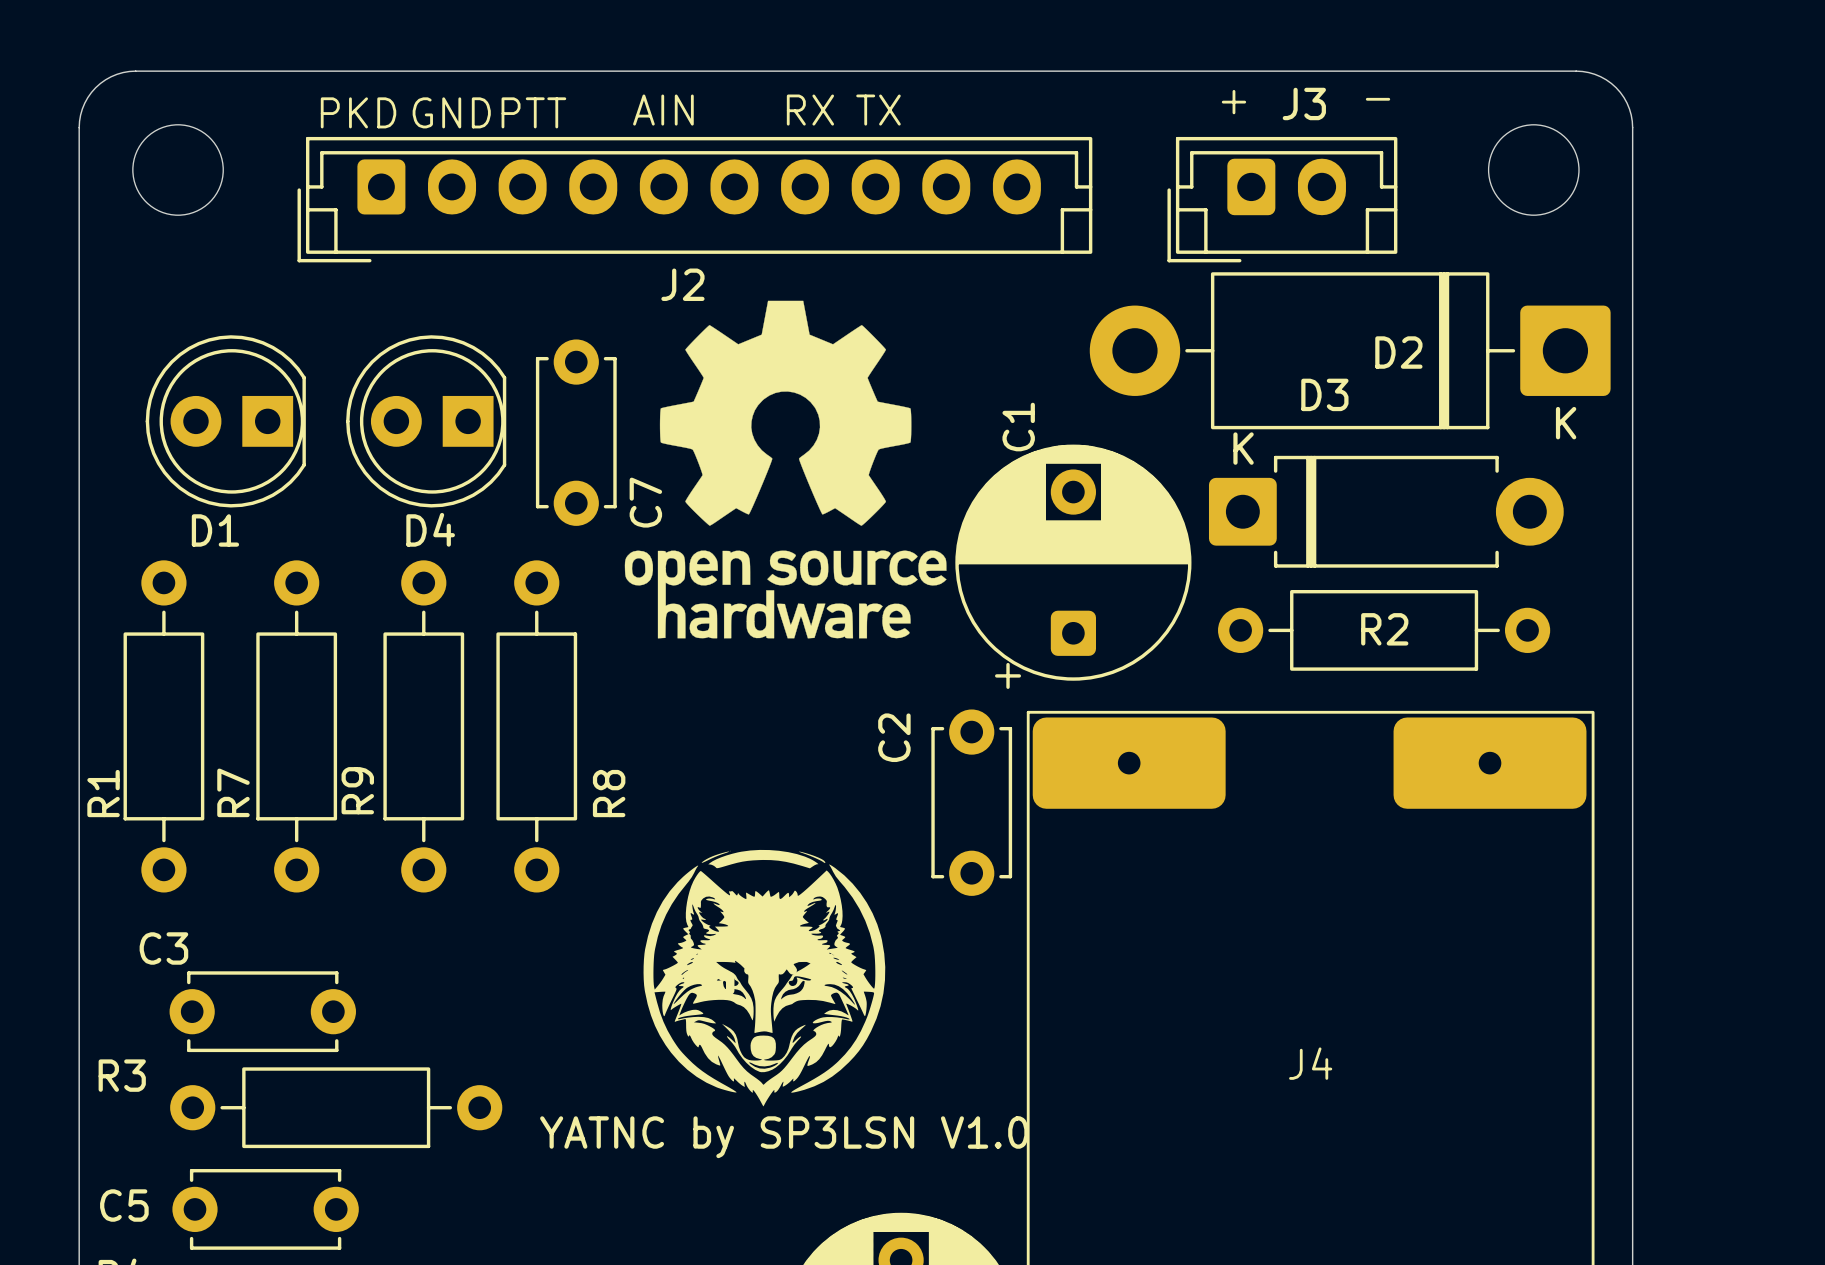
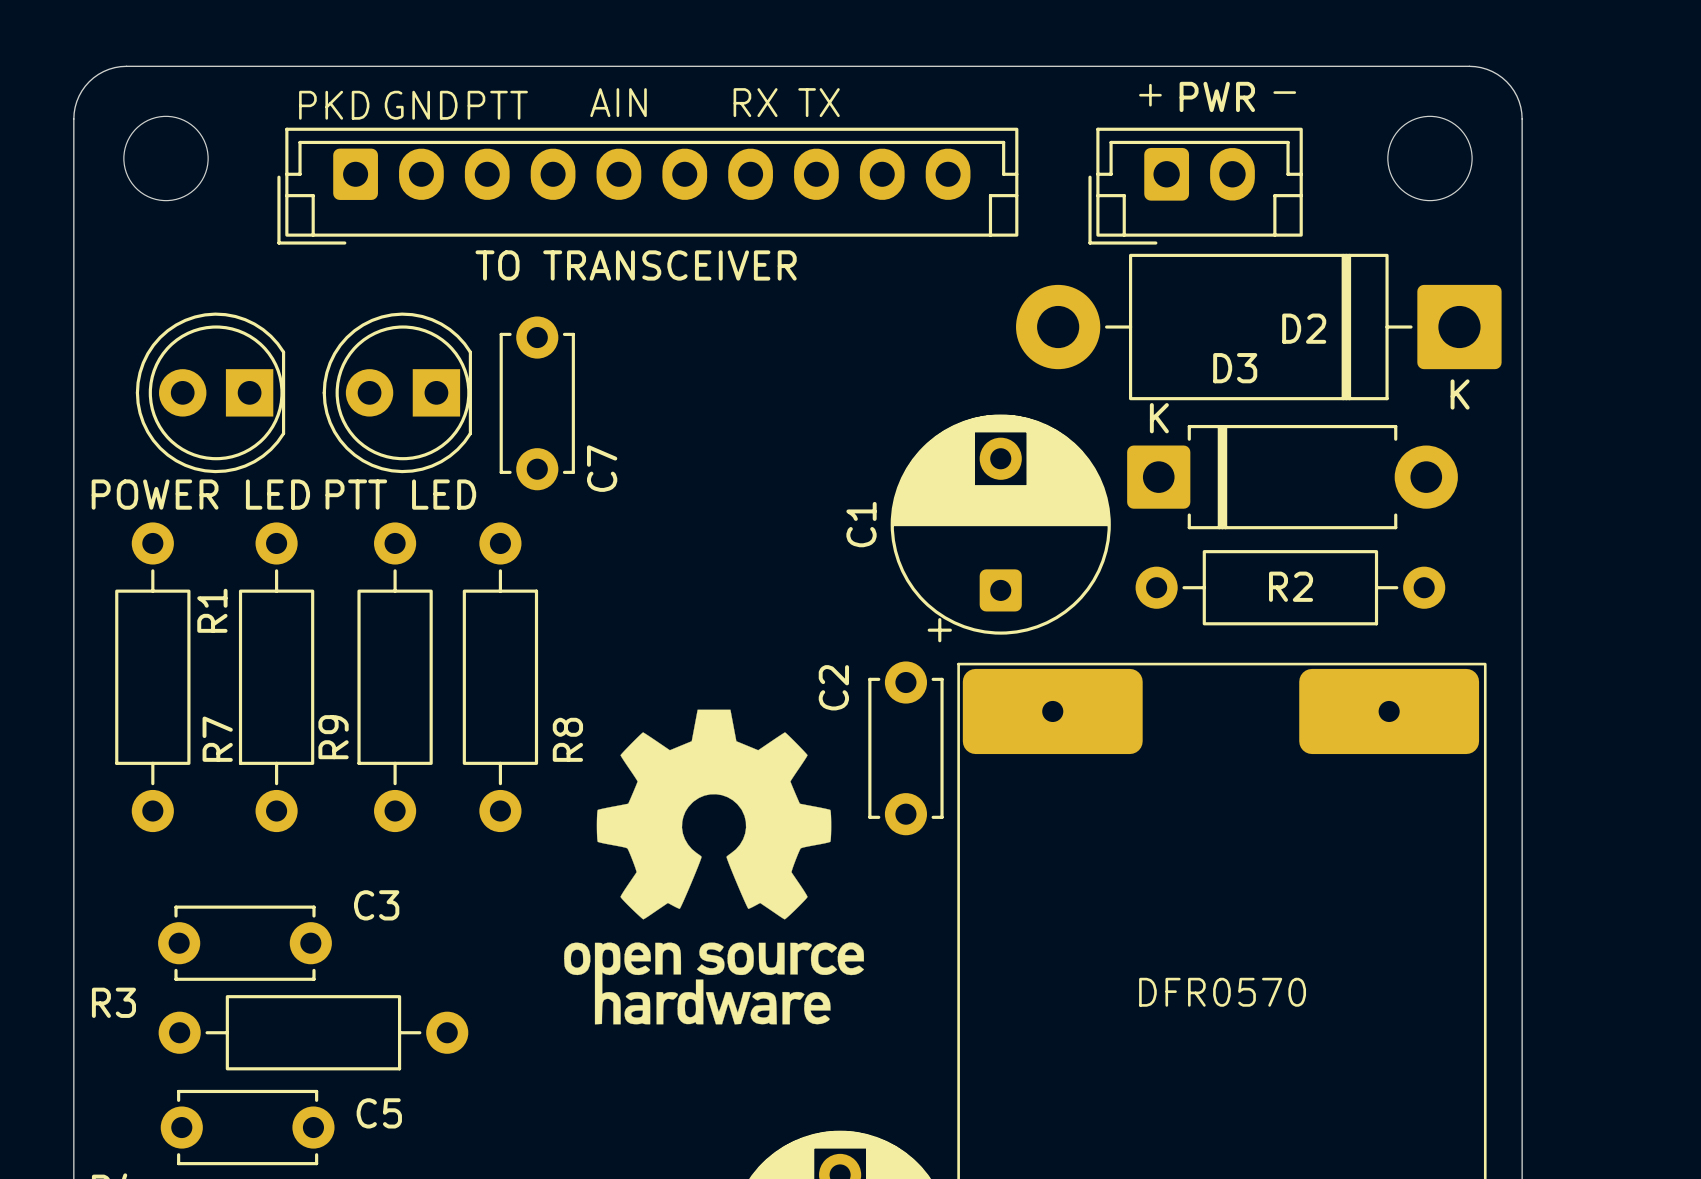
J3 name: J3 (1304, 103) -> PWR (1217, 96)
J2 name: J2 (682, 284) -> TO TRANSCEIVER (636, 265)
C1 name position: C1 (1018, 427) -> C1 (861, 524)
drawing position: (785, 469) -> (714, 867)
D4 name: D4 (430, 529) -> PTT LED (400, 494)
D1 name: D1 (215, 530) -> POWER LED (200, 494)
R1 name position: R1 (103, 793) -> R1 (212, 610)
C3 name position: C3 (163, 948) -> C3 (376, 905)
part: (764, 978) -> none
J4 name: J4 (1310, 1063) -> DFR0570 (1222, 992)
text: YATNC by SP3LSN V1.0 (784, 1137) -> none
C5 name position: C5 (124, 1205) -> C5 (379, 1113)

